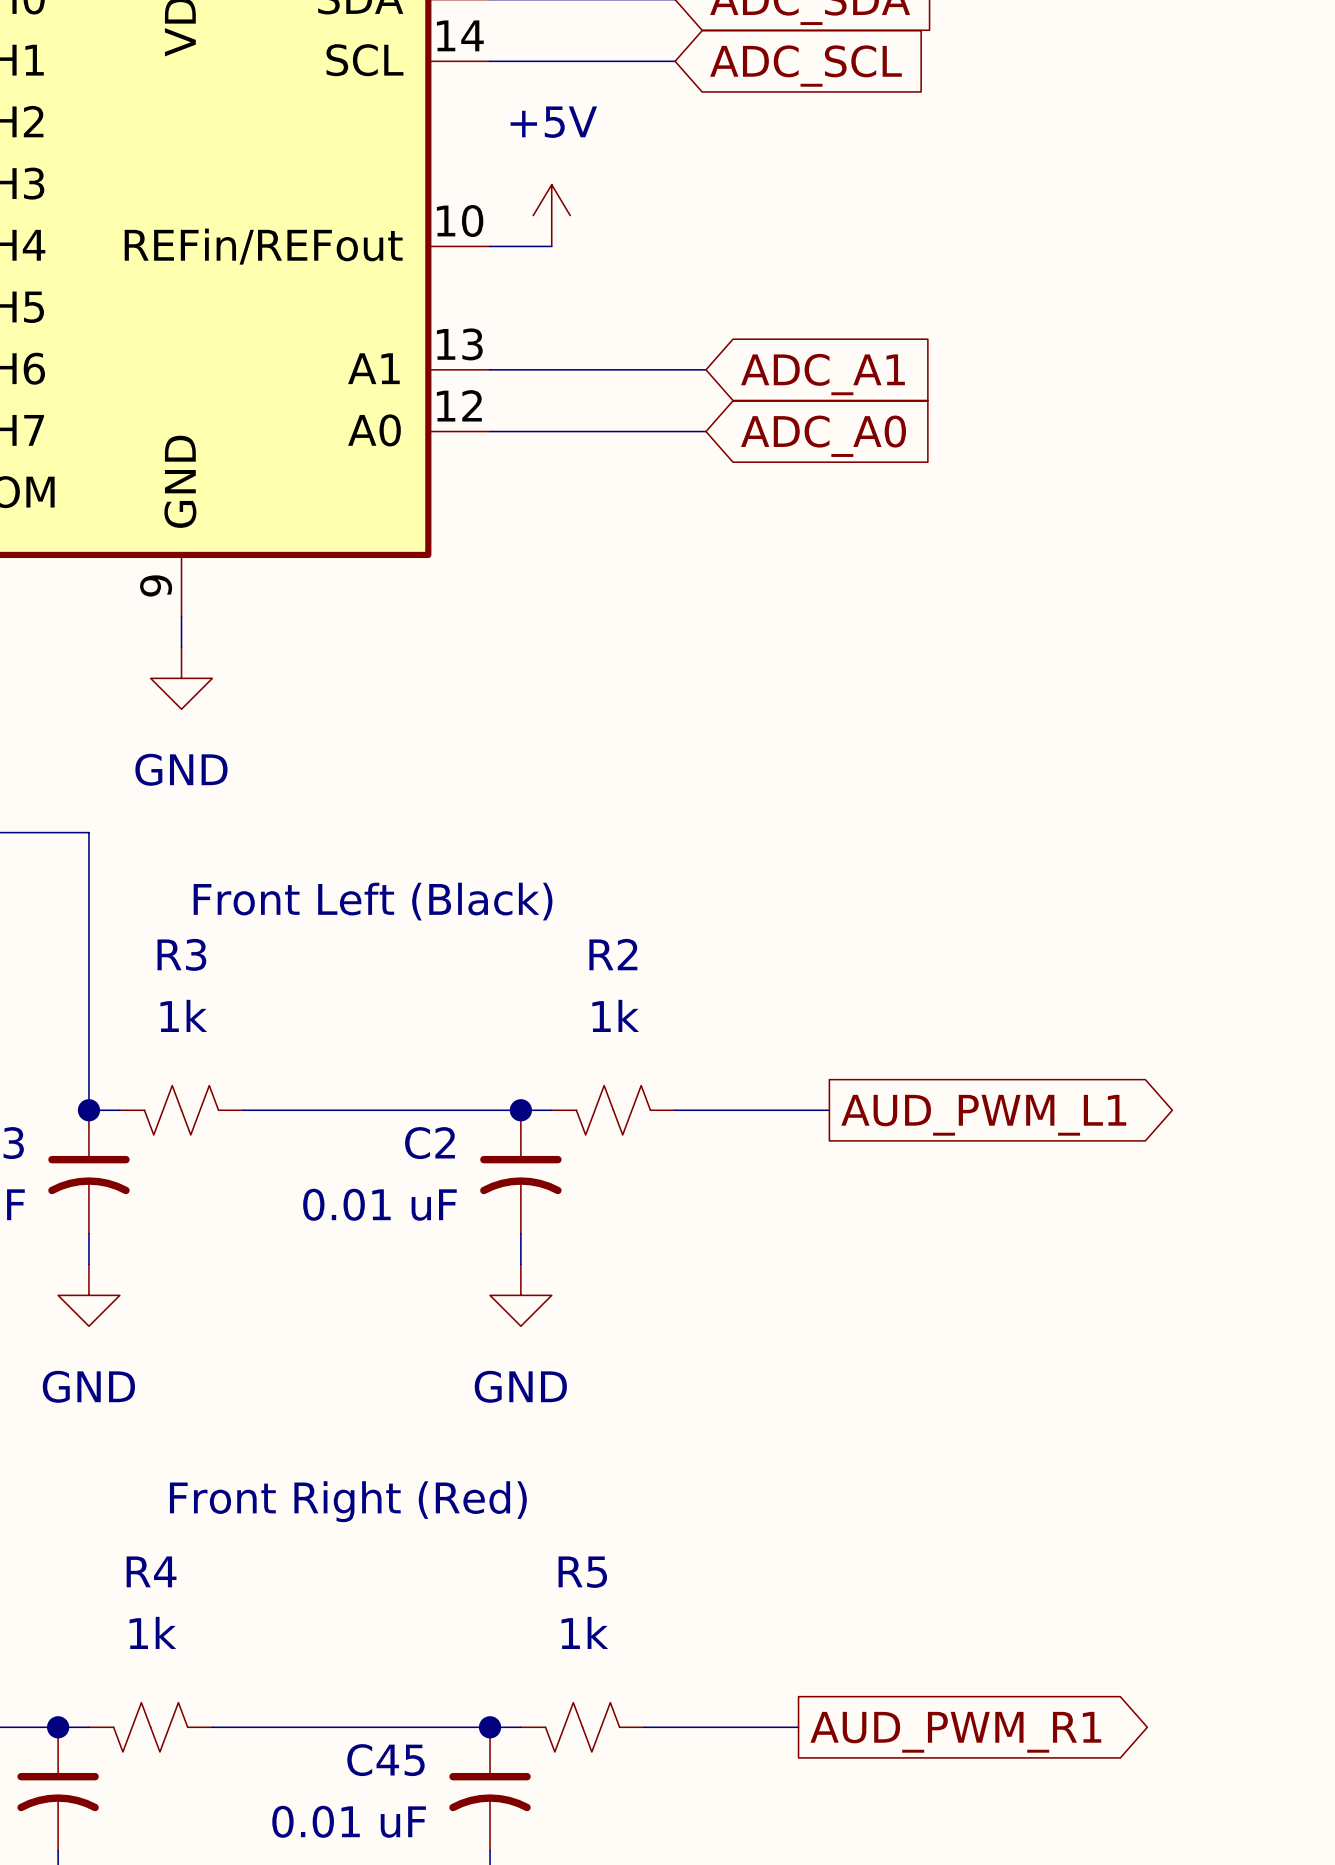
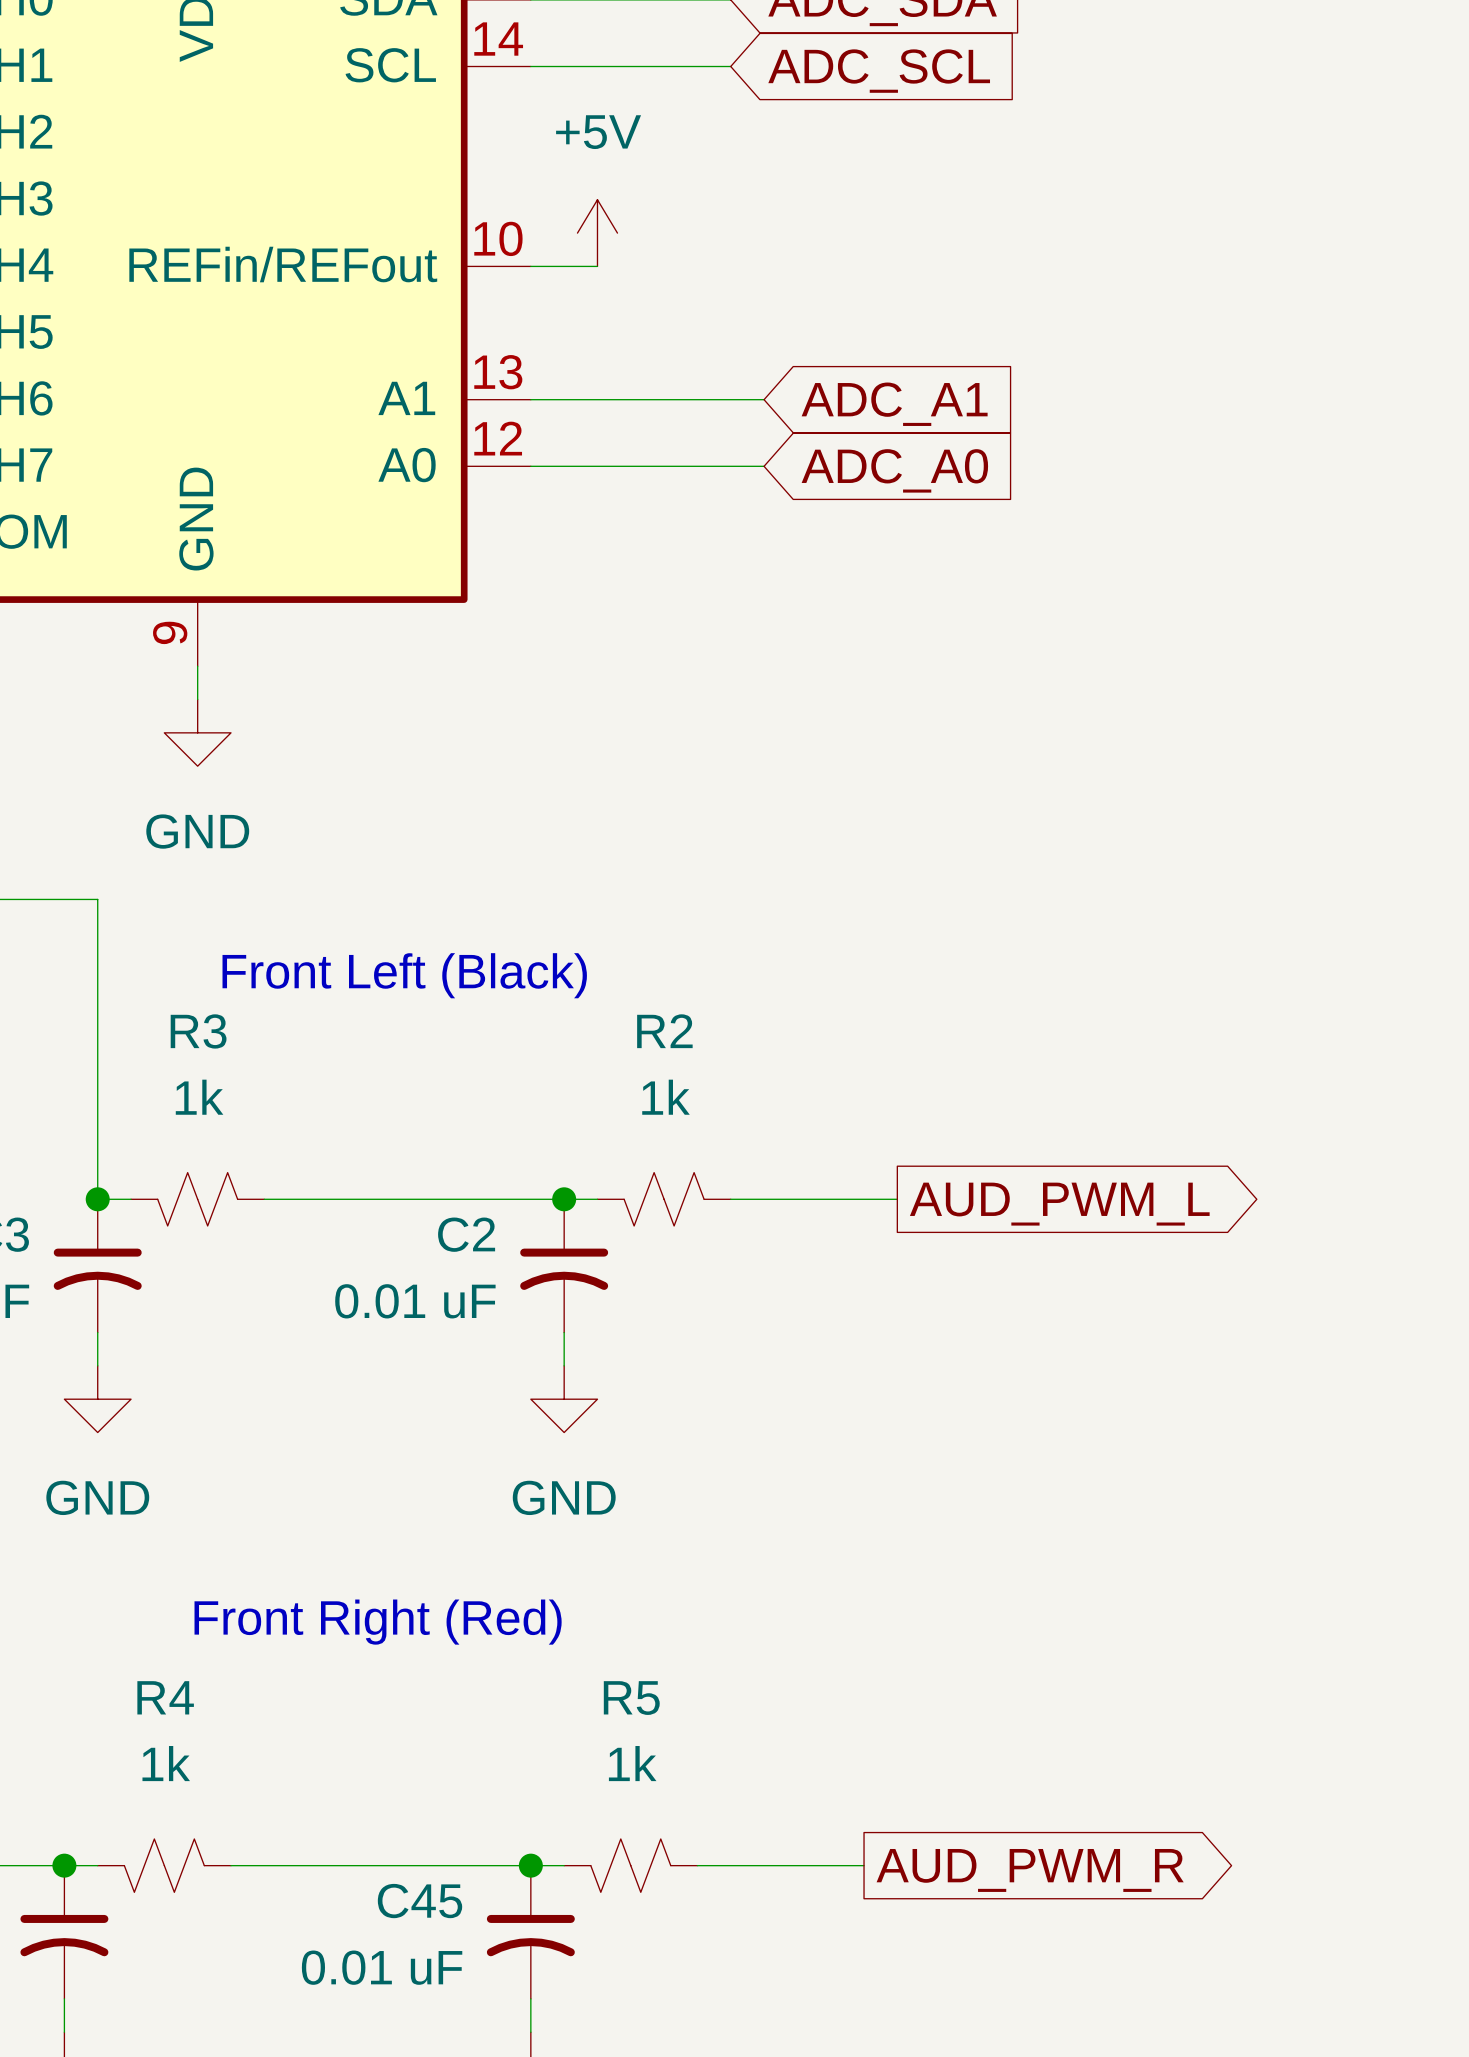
global label: AUD_PWM_L1 (983, 1115) -> AUD_PWM_L (1059, 1204)
global label: AUD_PWM_R1 (955, 1732) -> AUD_PWM_R (1030, 1870)

